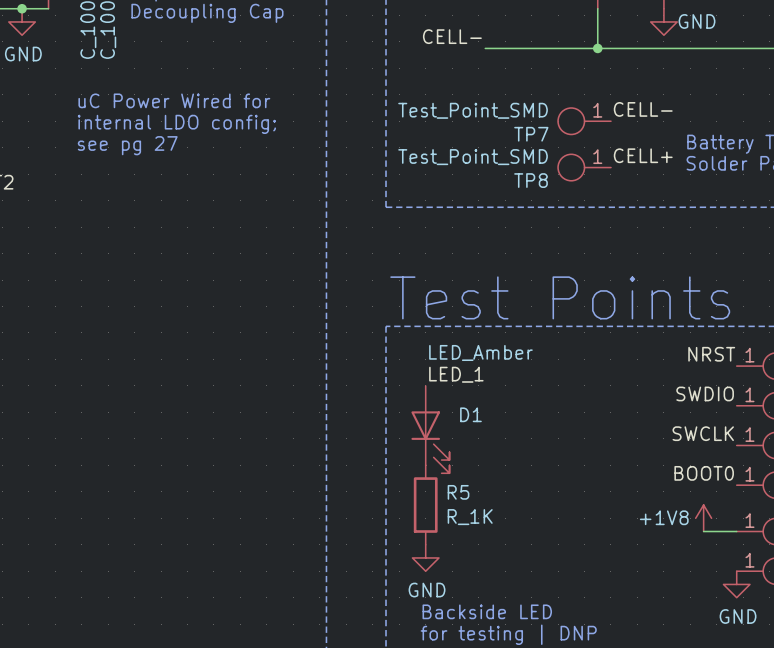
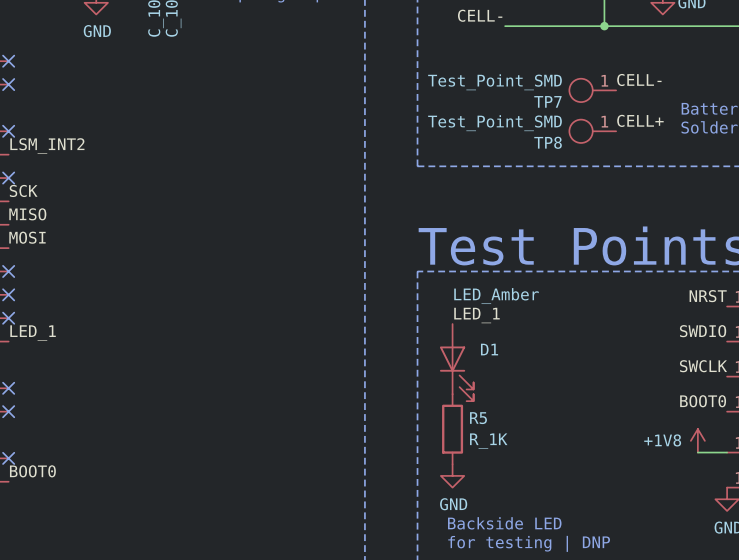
text: uC Power Wired for (174, 100) -> none
text: internal LDO config; (176, 124) -> none
text: see pg 27 (127, 145) -> none

